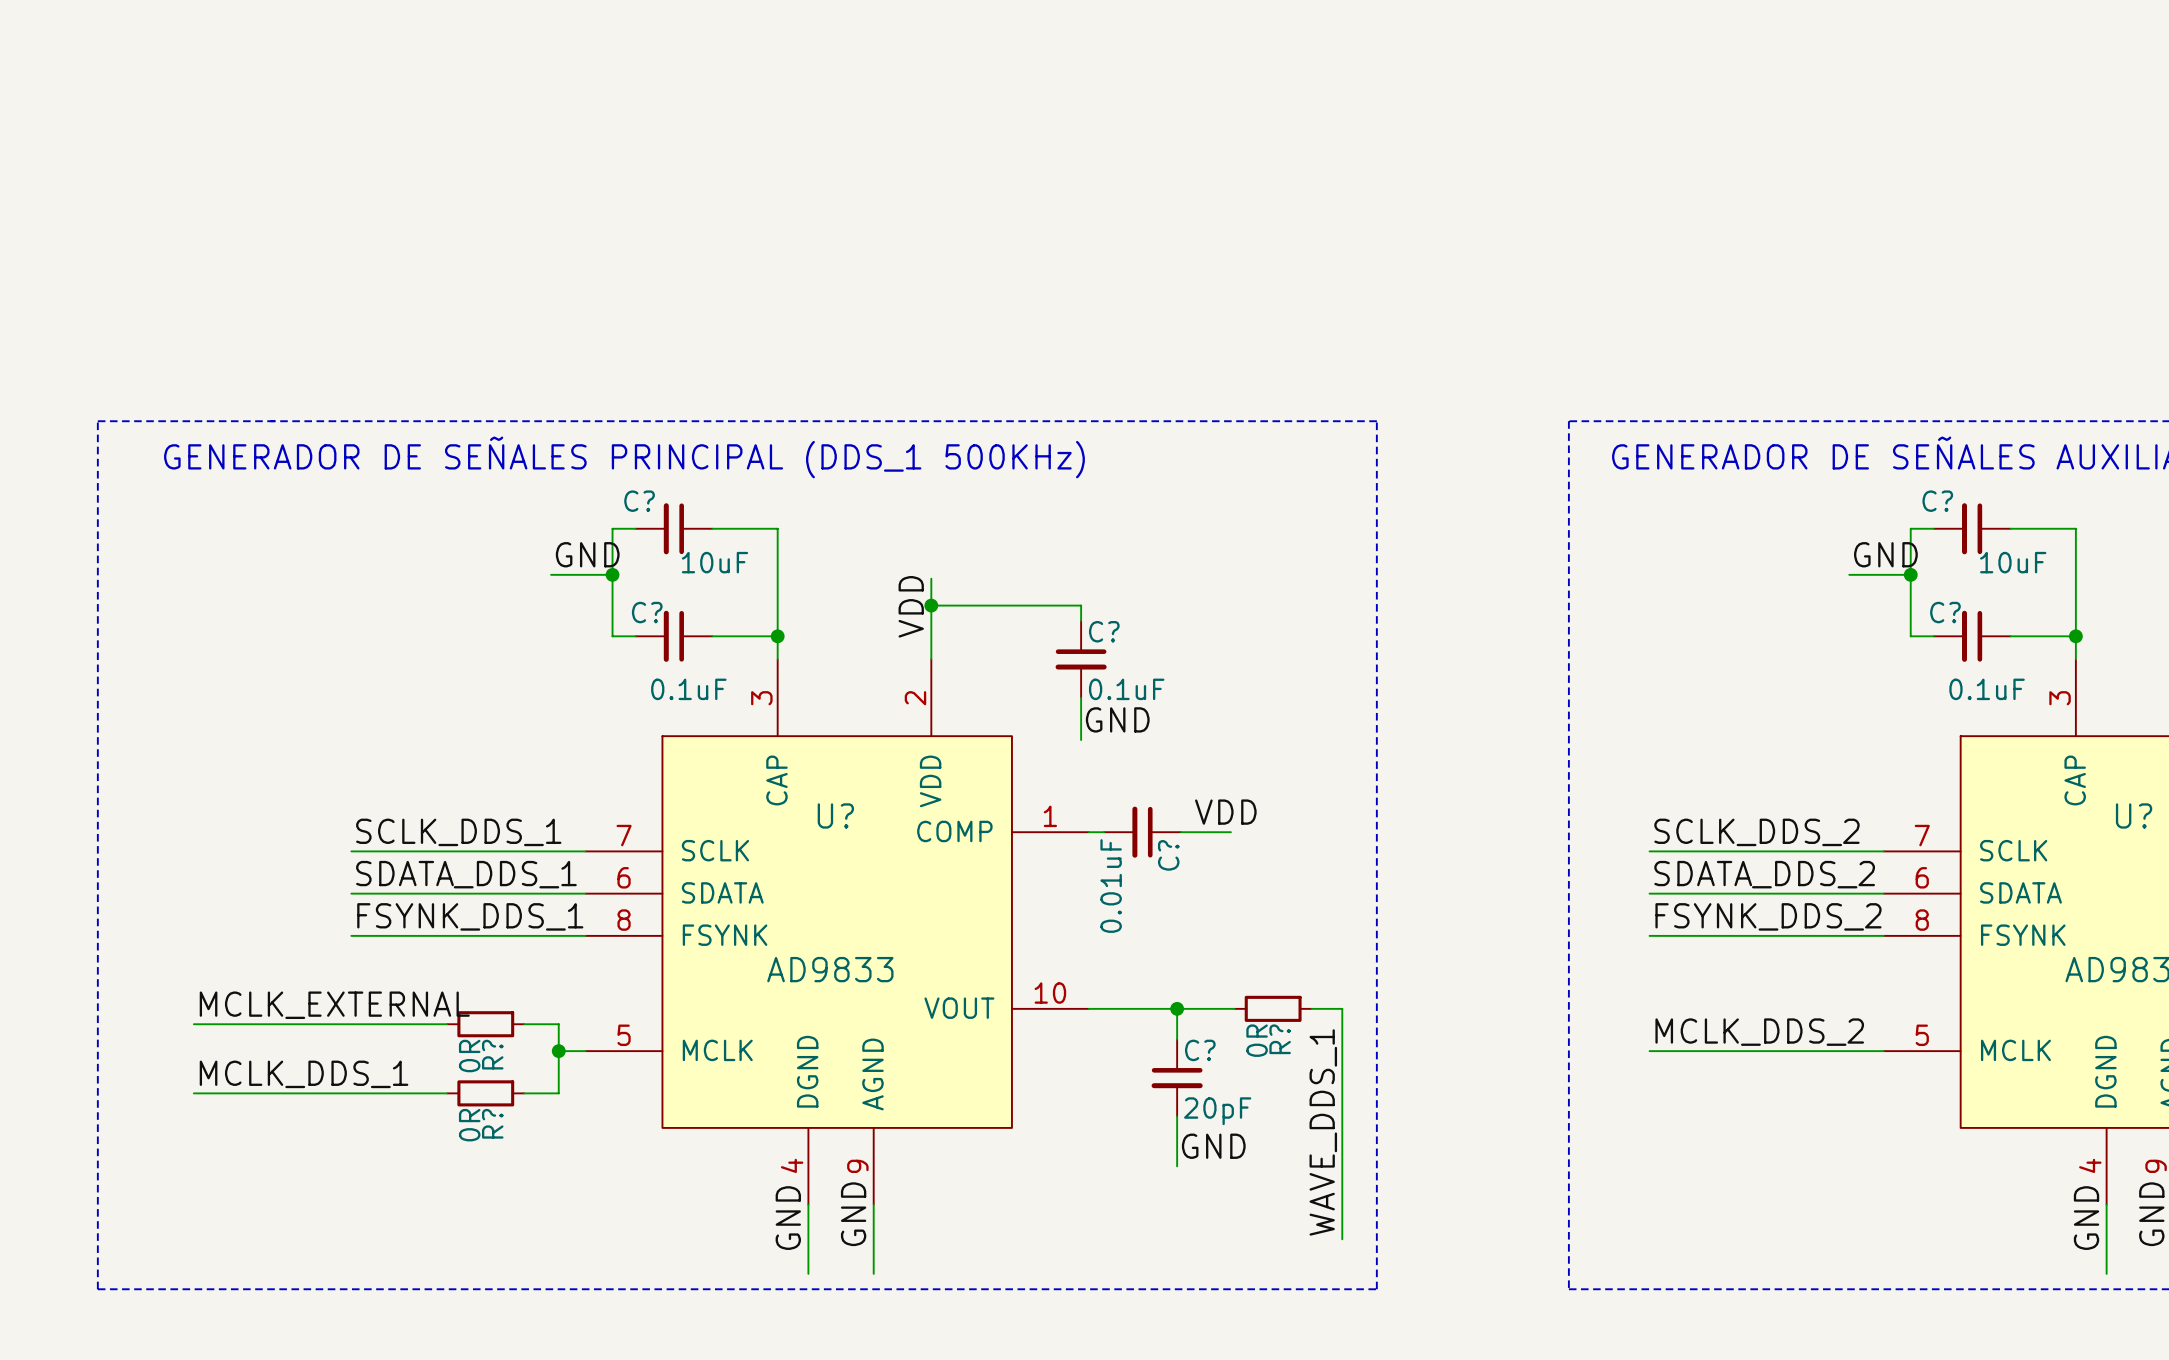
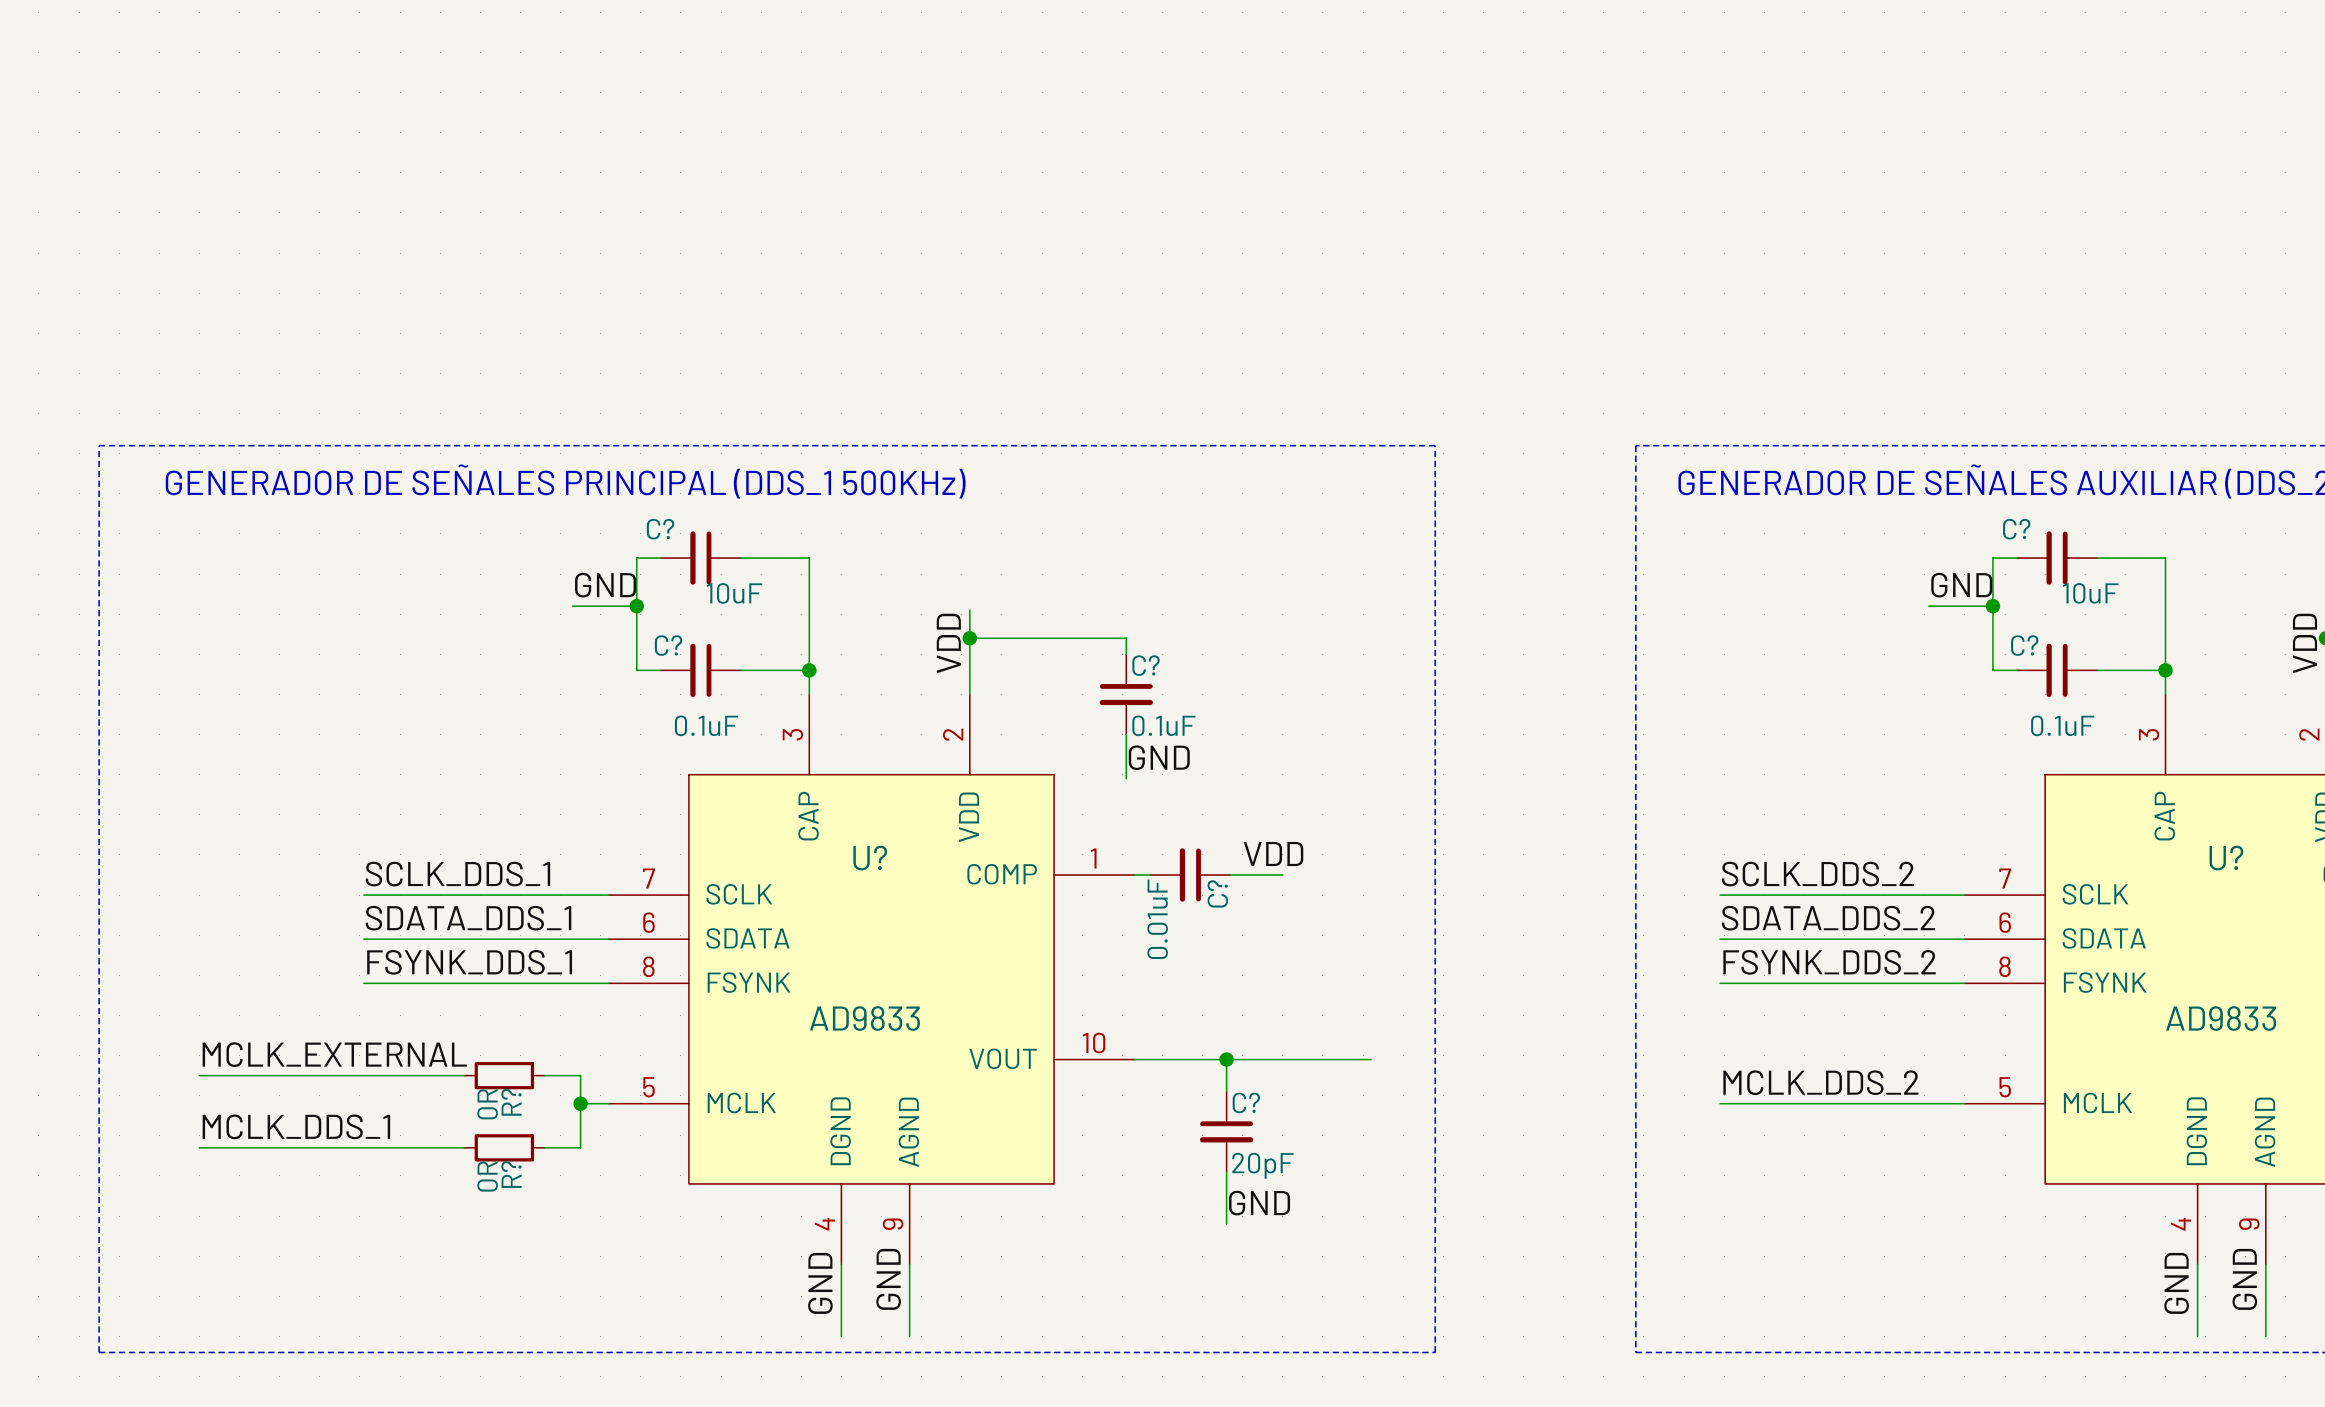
wire: none -> (1286, 1059) (1367, 1059)
R?: 0R (1273, 1008) -> none
wire: (1315, 1008) (1342, 1008) (1342, 1239) -> none
label: WAVE_DDS_1 (1323, 1132) -> none

